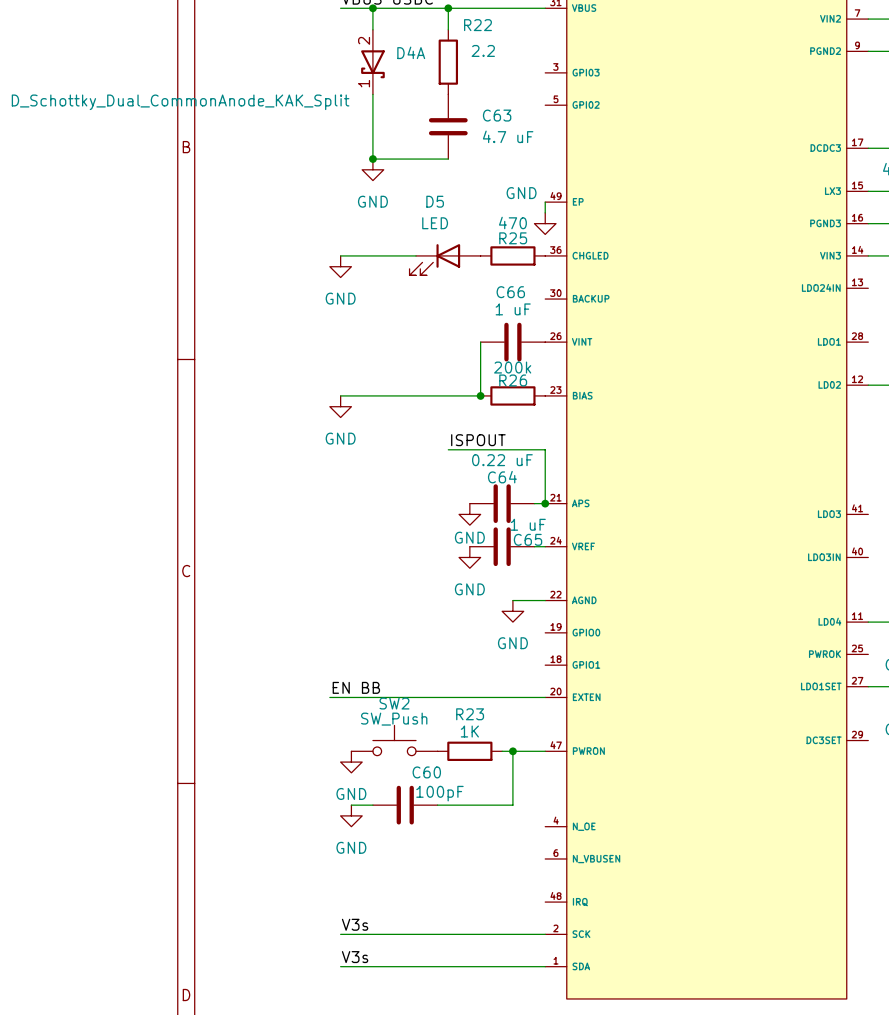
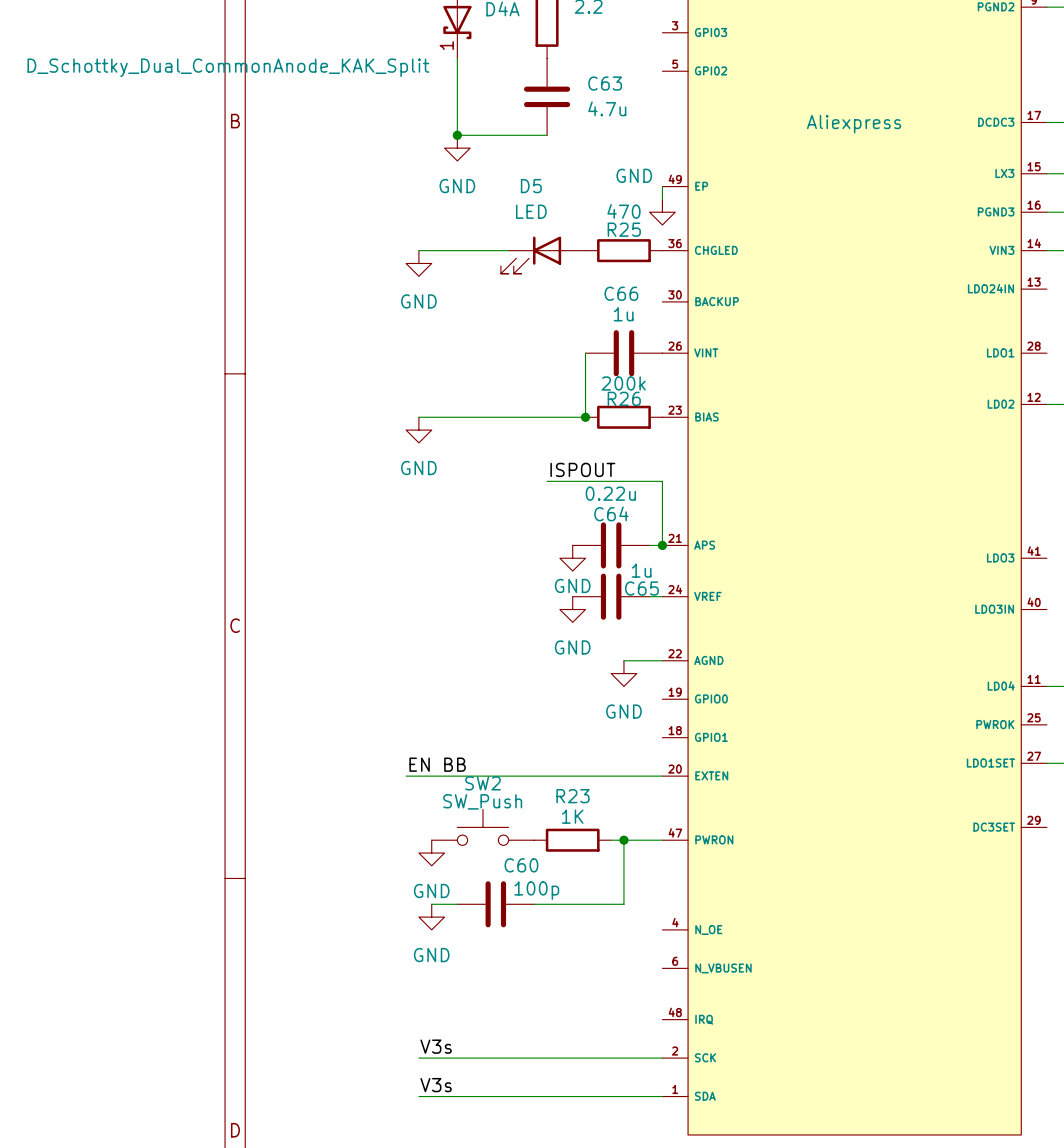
C63 value: 4.7 uF (508, 136) -> 4.7u (607, 108)
part text: none -> Aliexpress (854, 124)
C66 value: 1 uF (513, 309) -> 1u (623, 314)
C64 value: 0.22 uF (502, 460) -> 0.22u (610, 493)
C65 value: 1 uF (528, 524) -> 1u (641, 570)
C60 value: 100pF (439, 793) -> 100p (536, 890)

